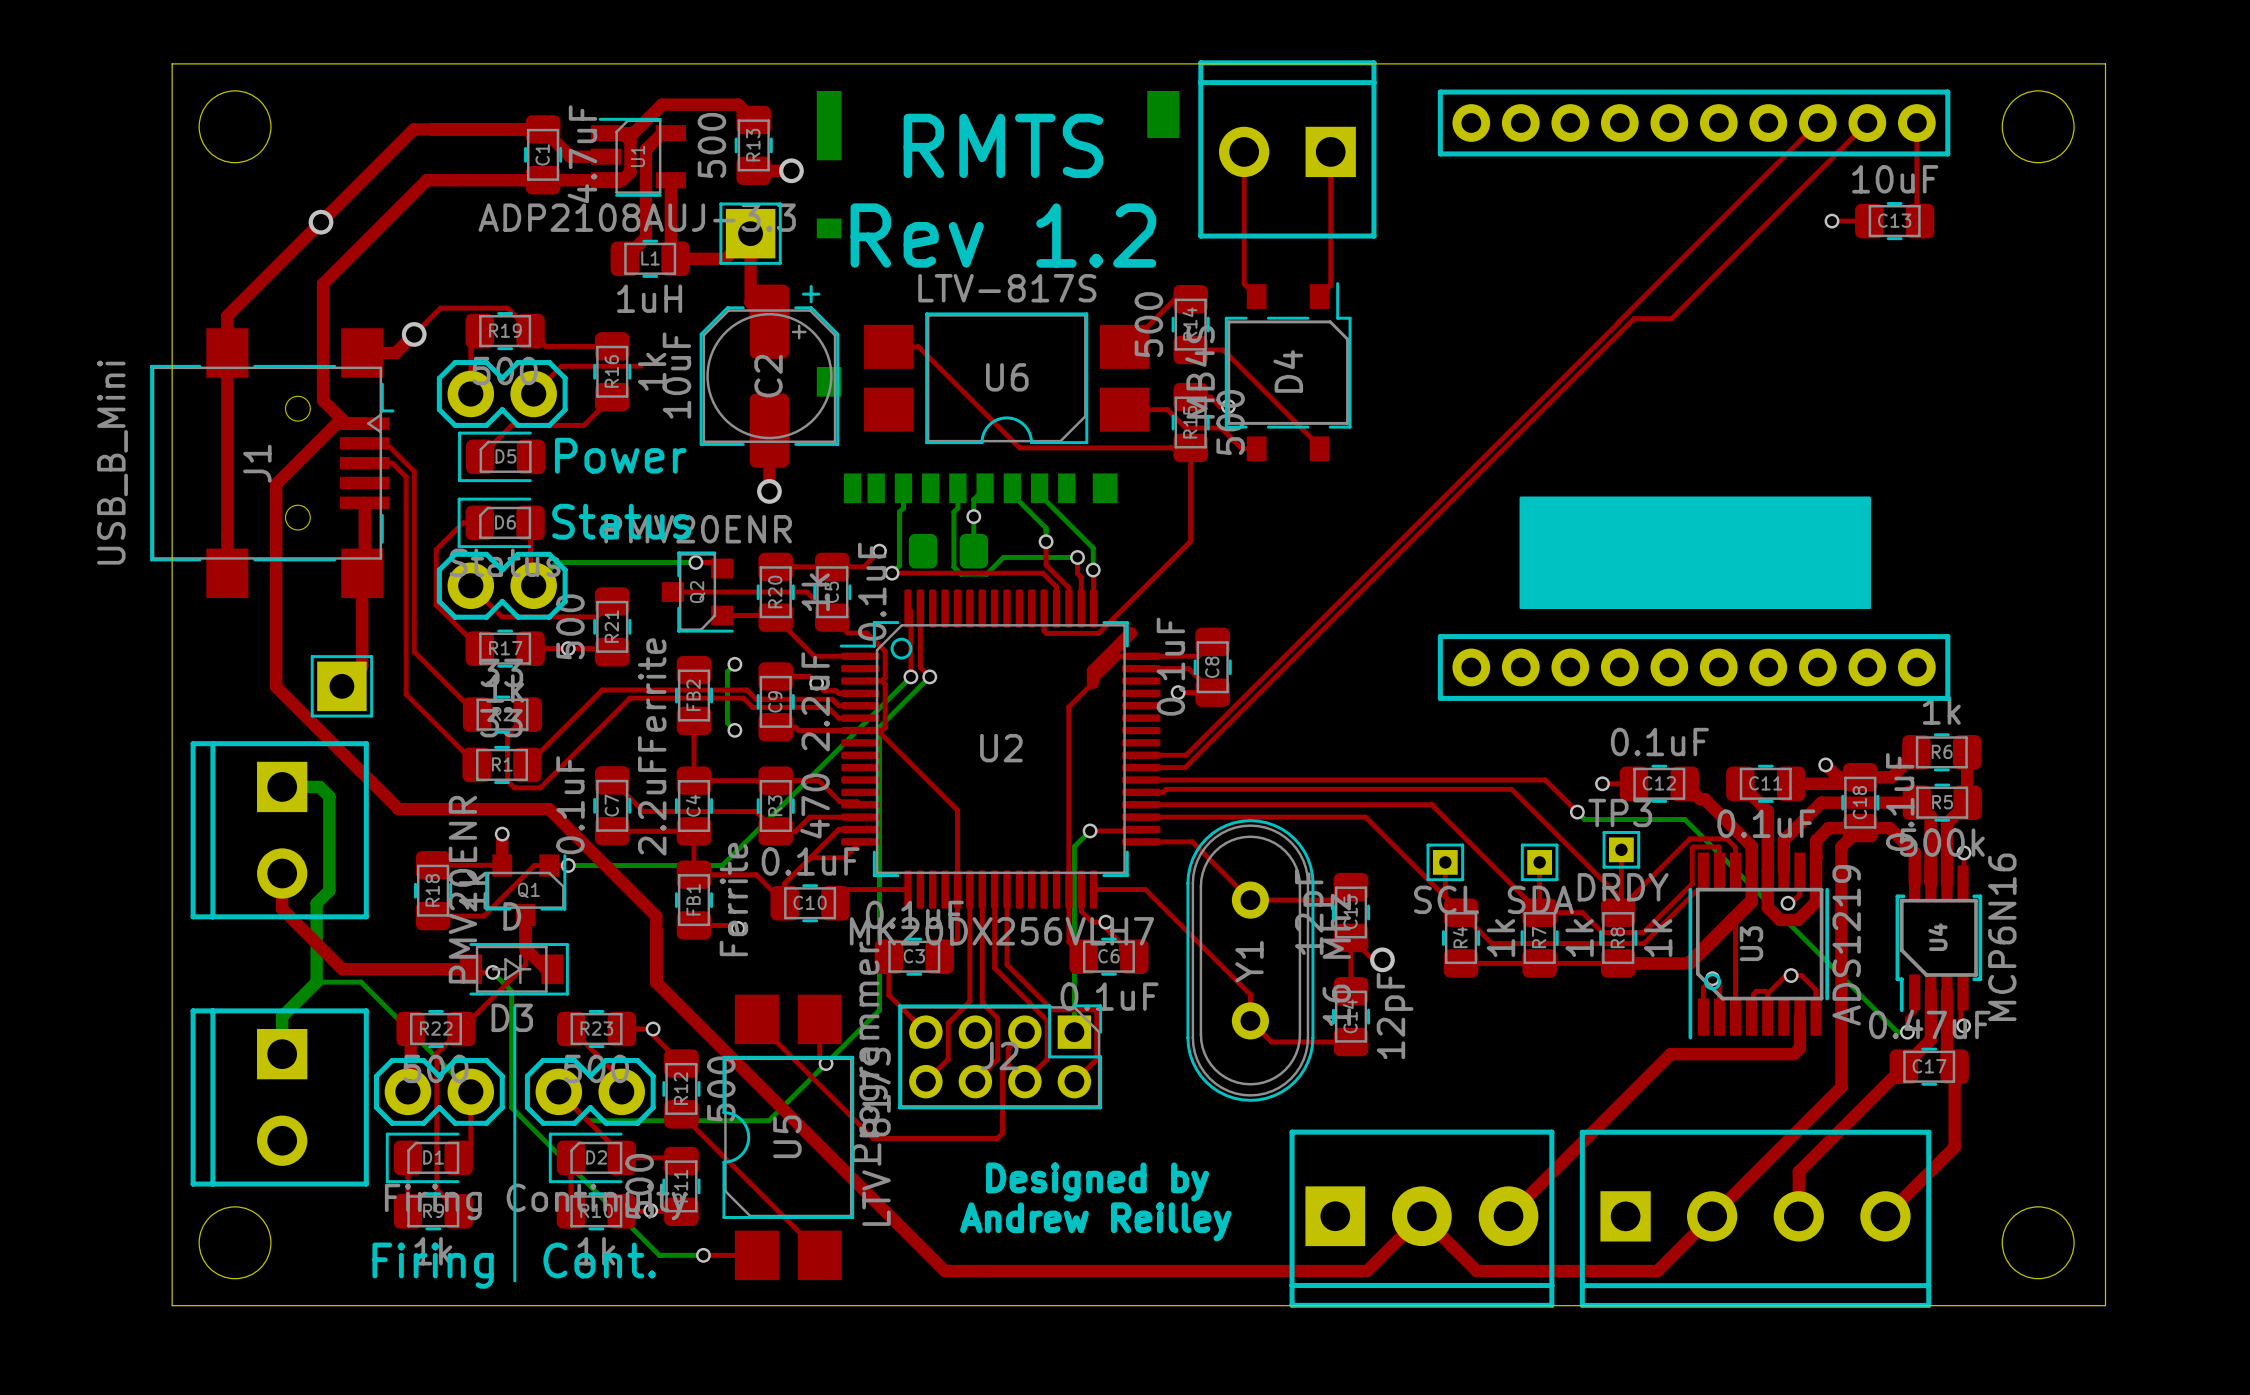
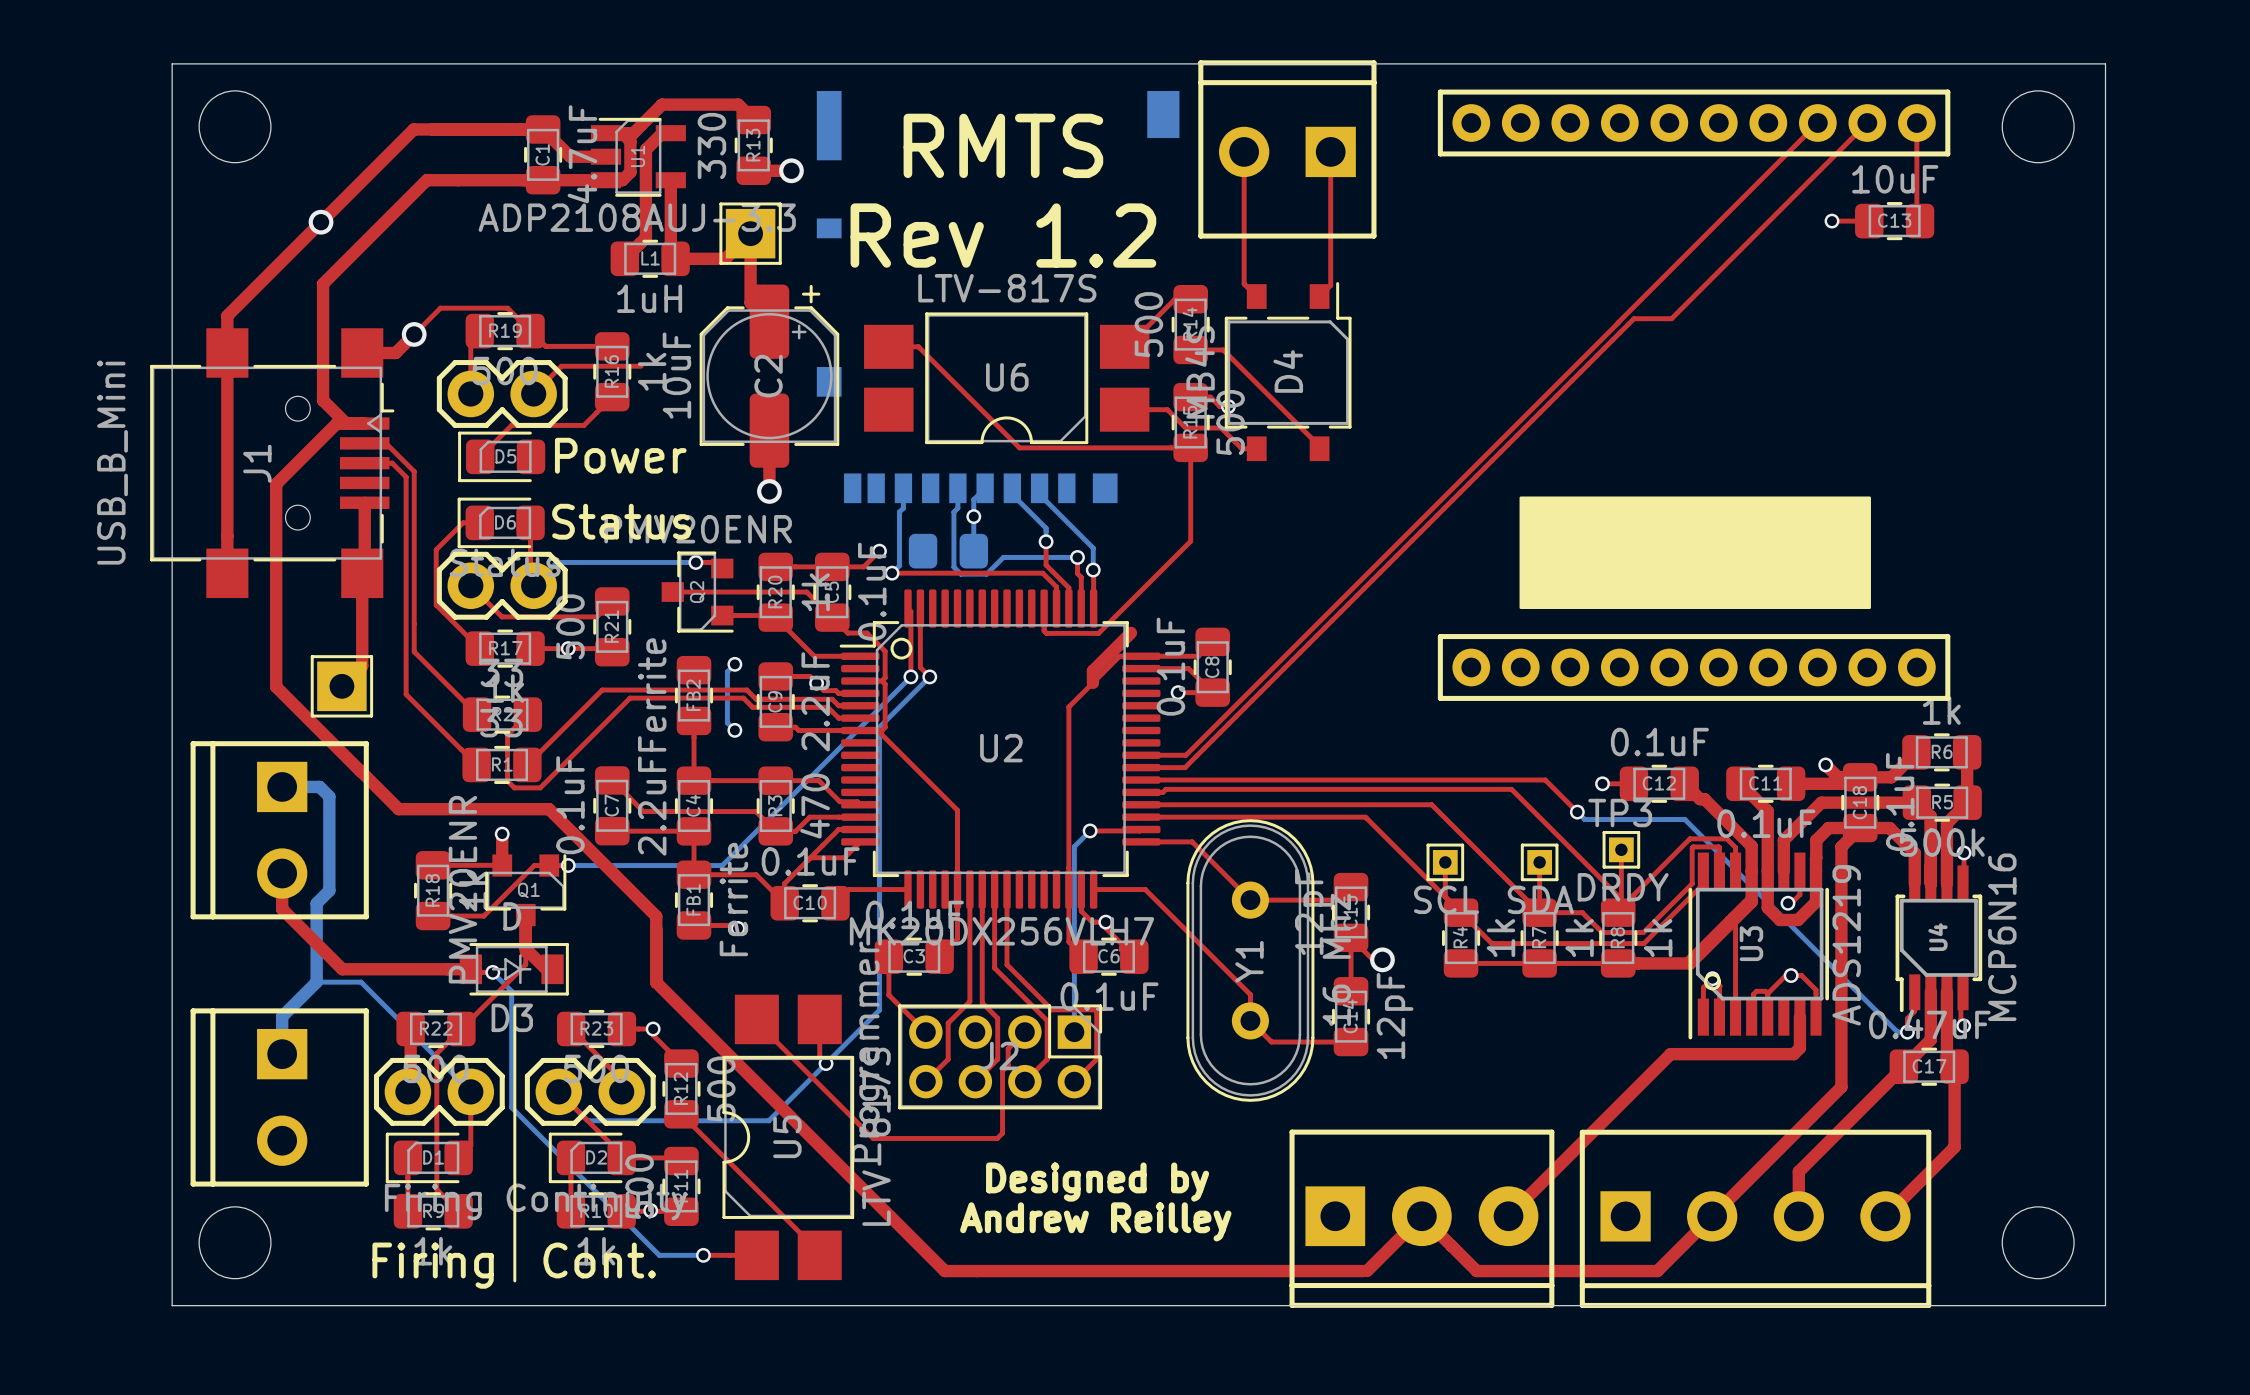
R13 value: 500 (711, 145) -> 330 (711, 146)

